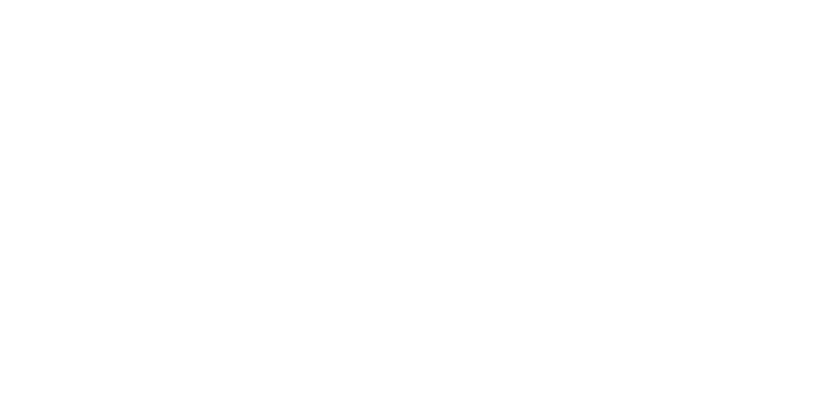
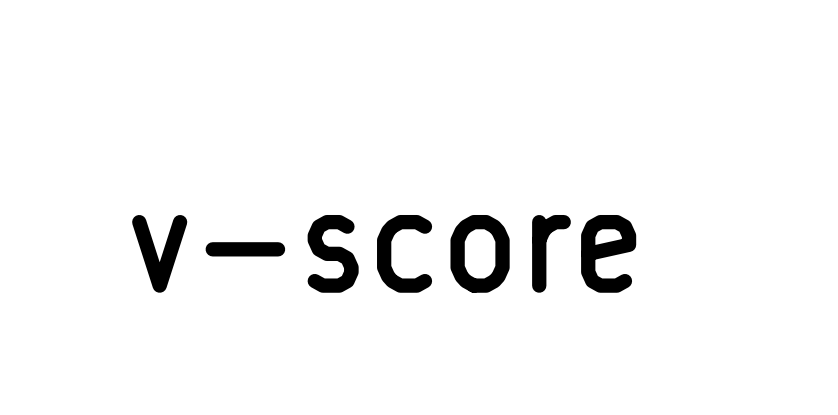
text: none -> v-score (384, 253)

